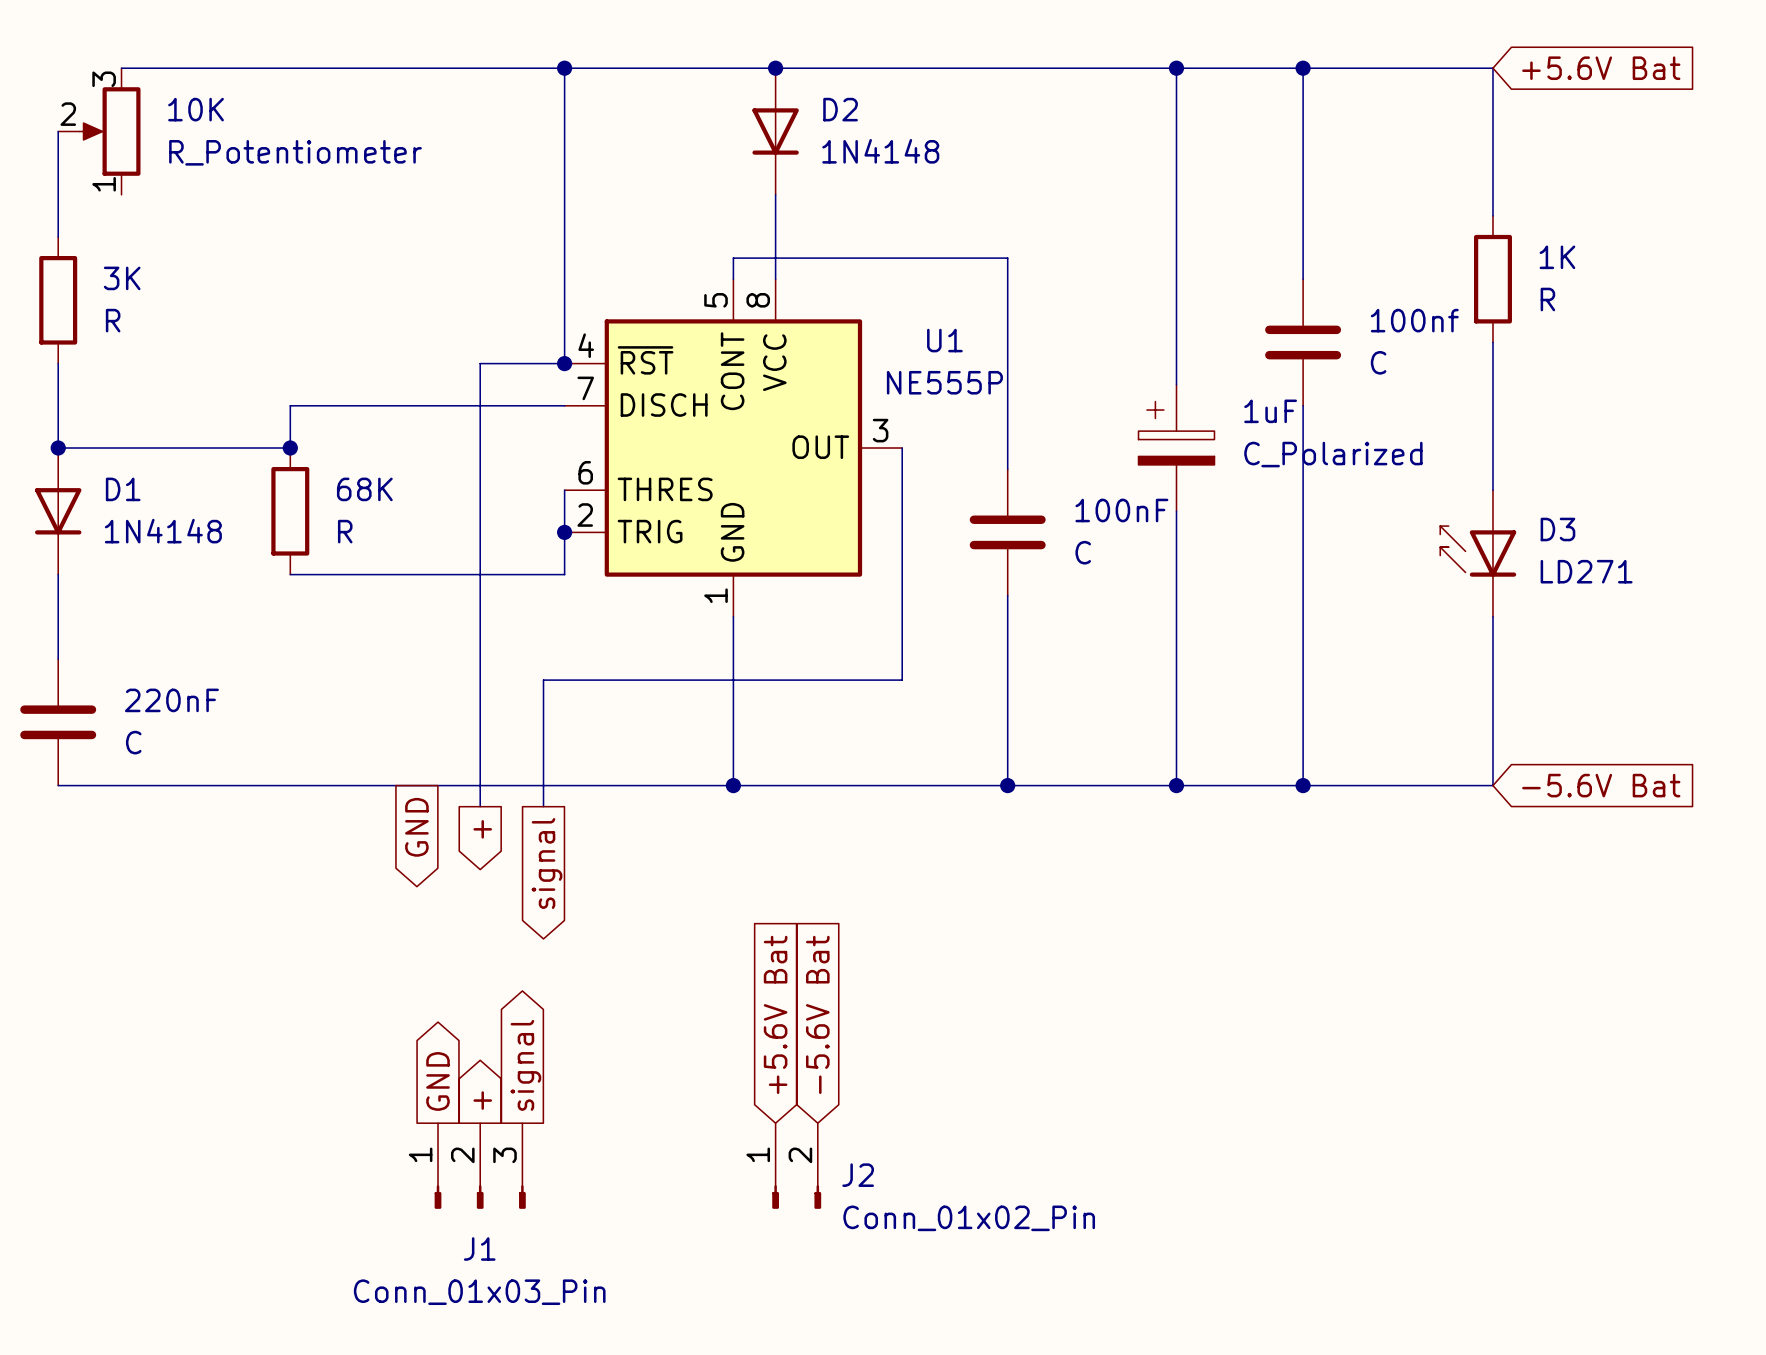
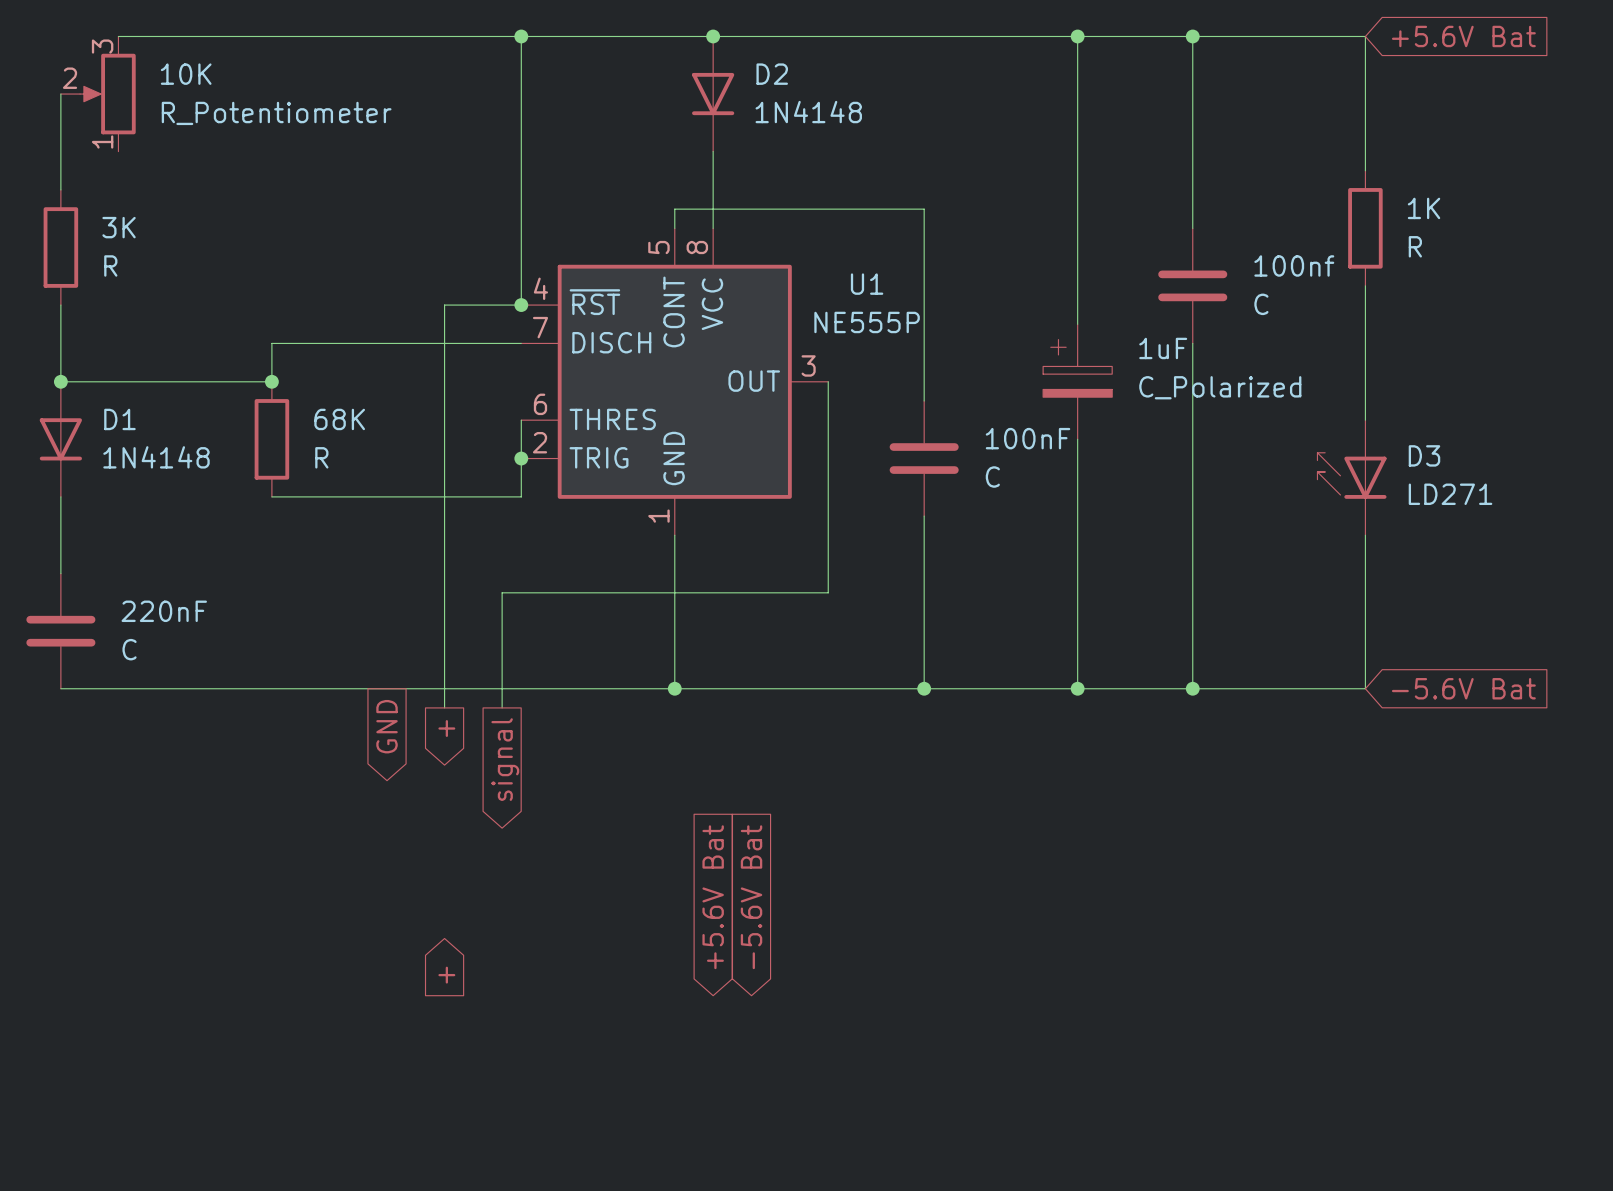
global label: signal (525, 1065) -> none
global label: GND (438, 1081) -> none
J1: Conn_01x03_Pin (480, 1166) -> none
J2: Conn_01x02_Pin (796, 1166) -> none

